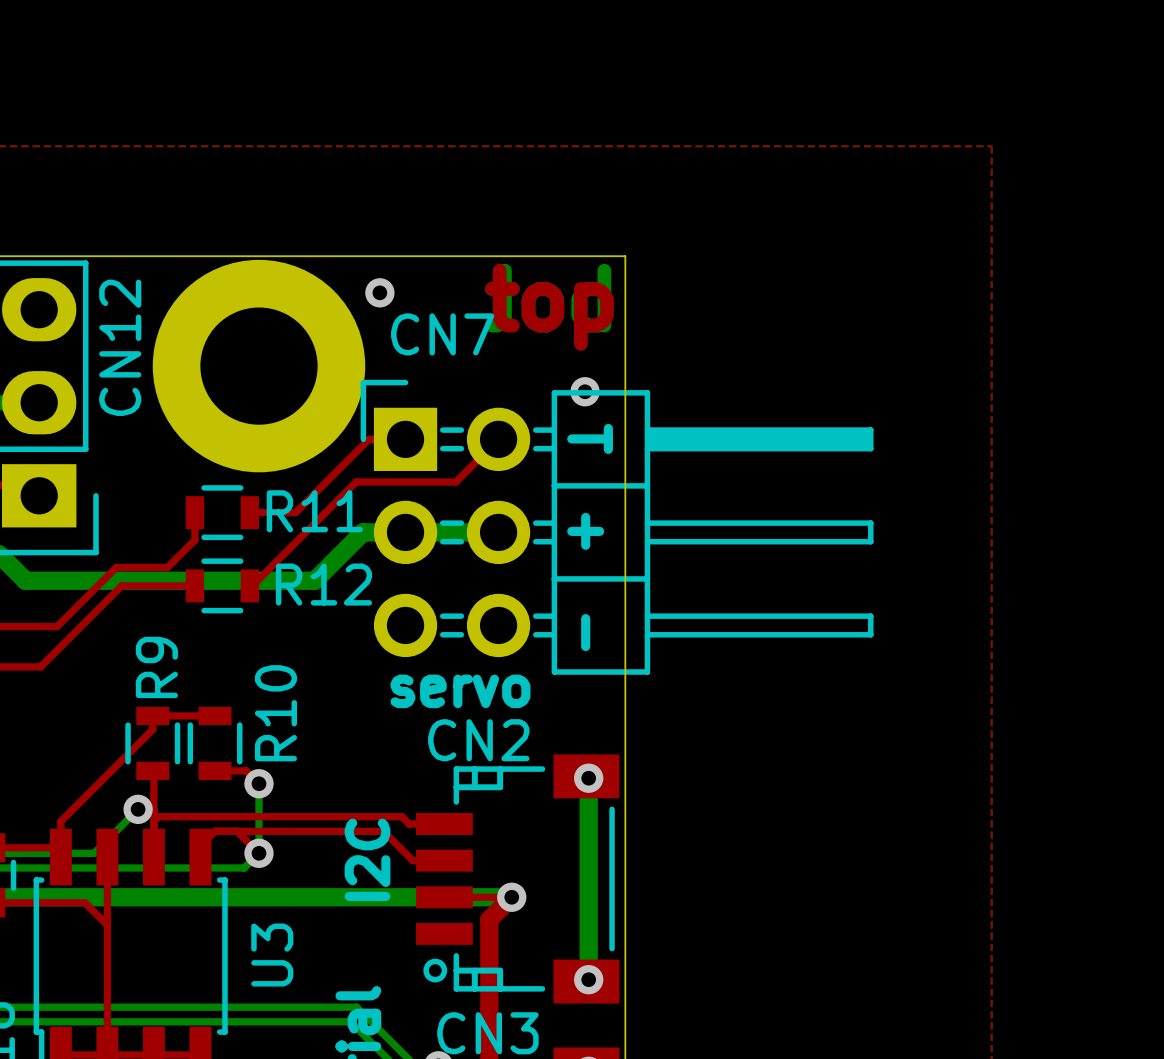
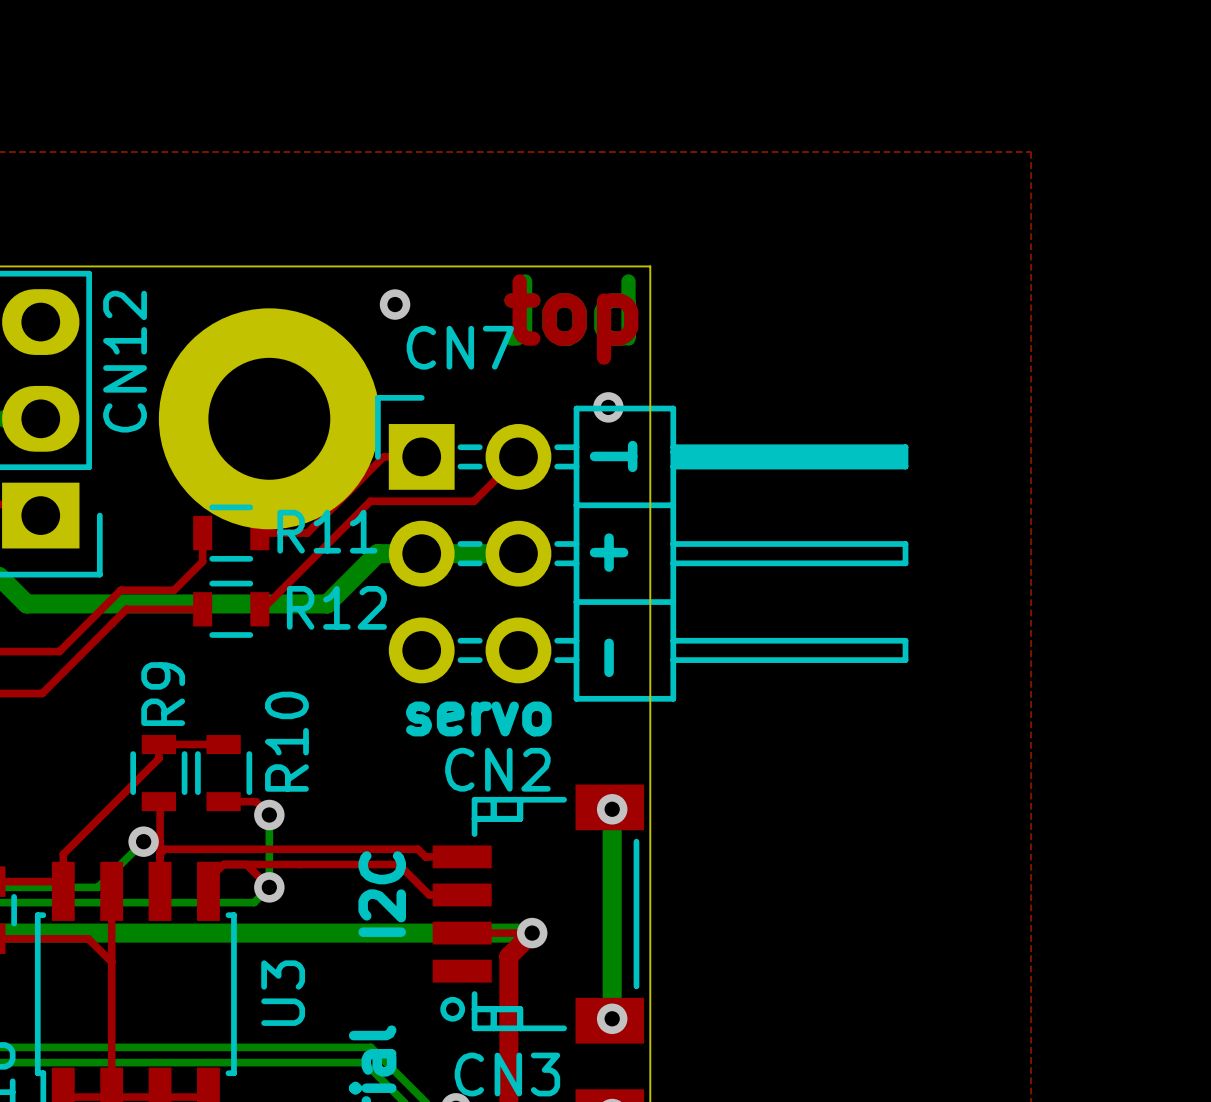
part position: (259, 366) -> (269, 418)

